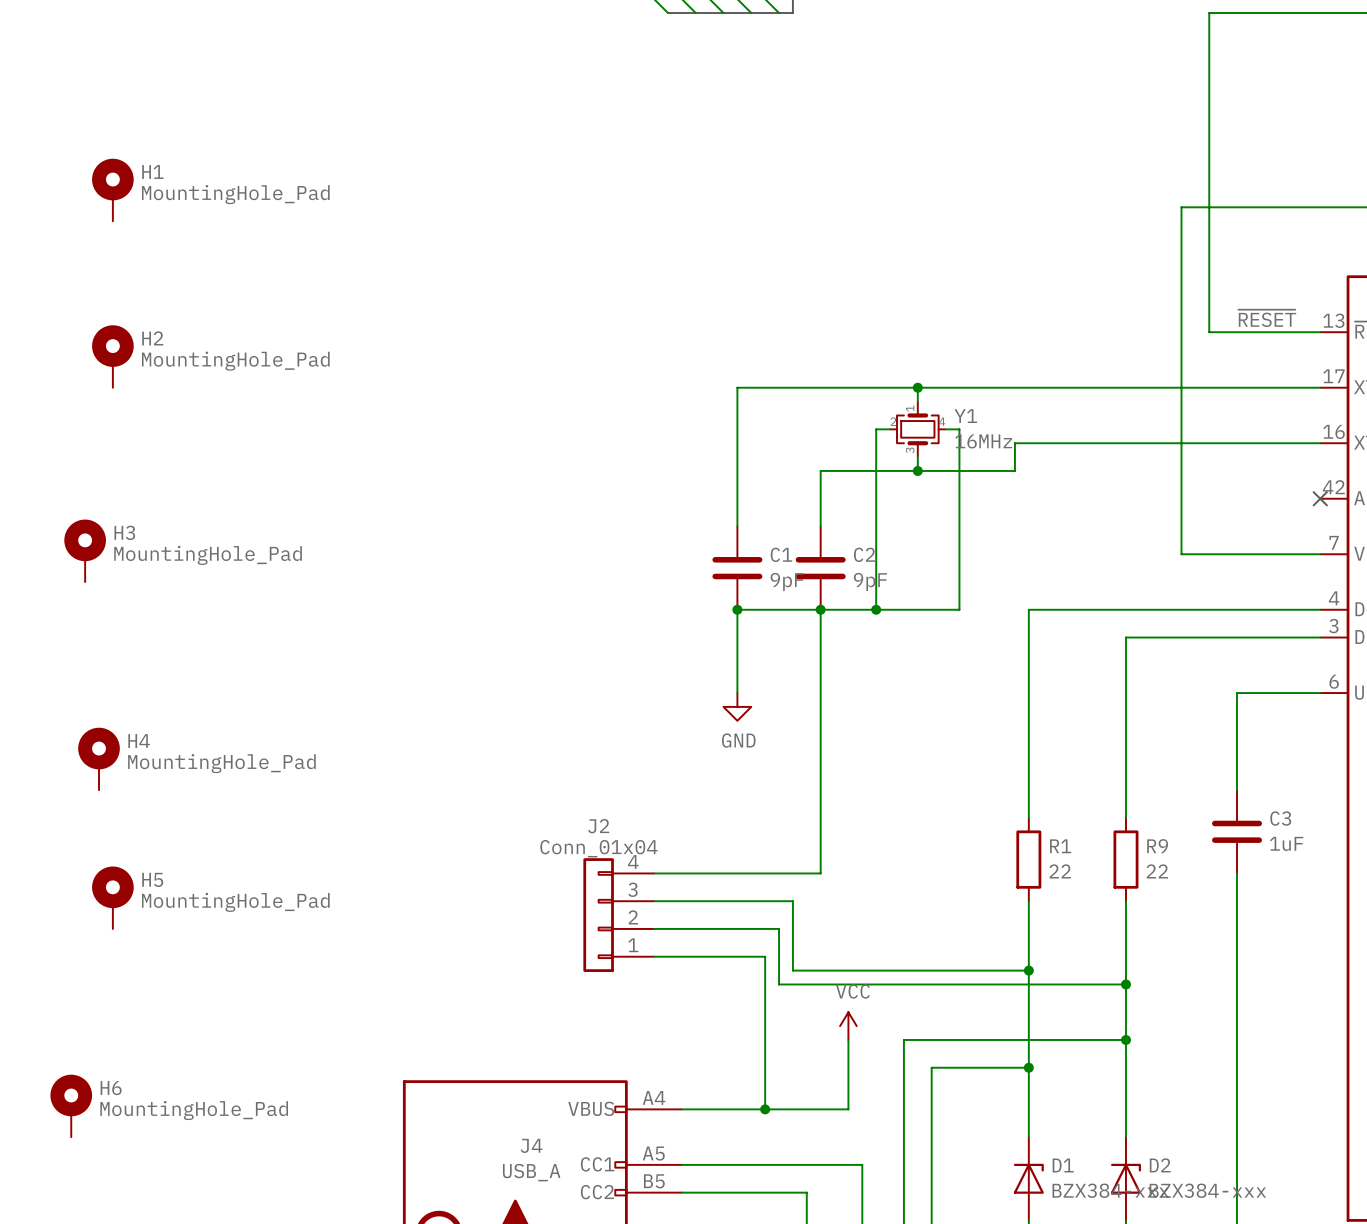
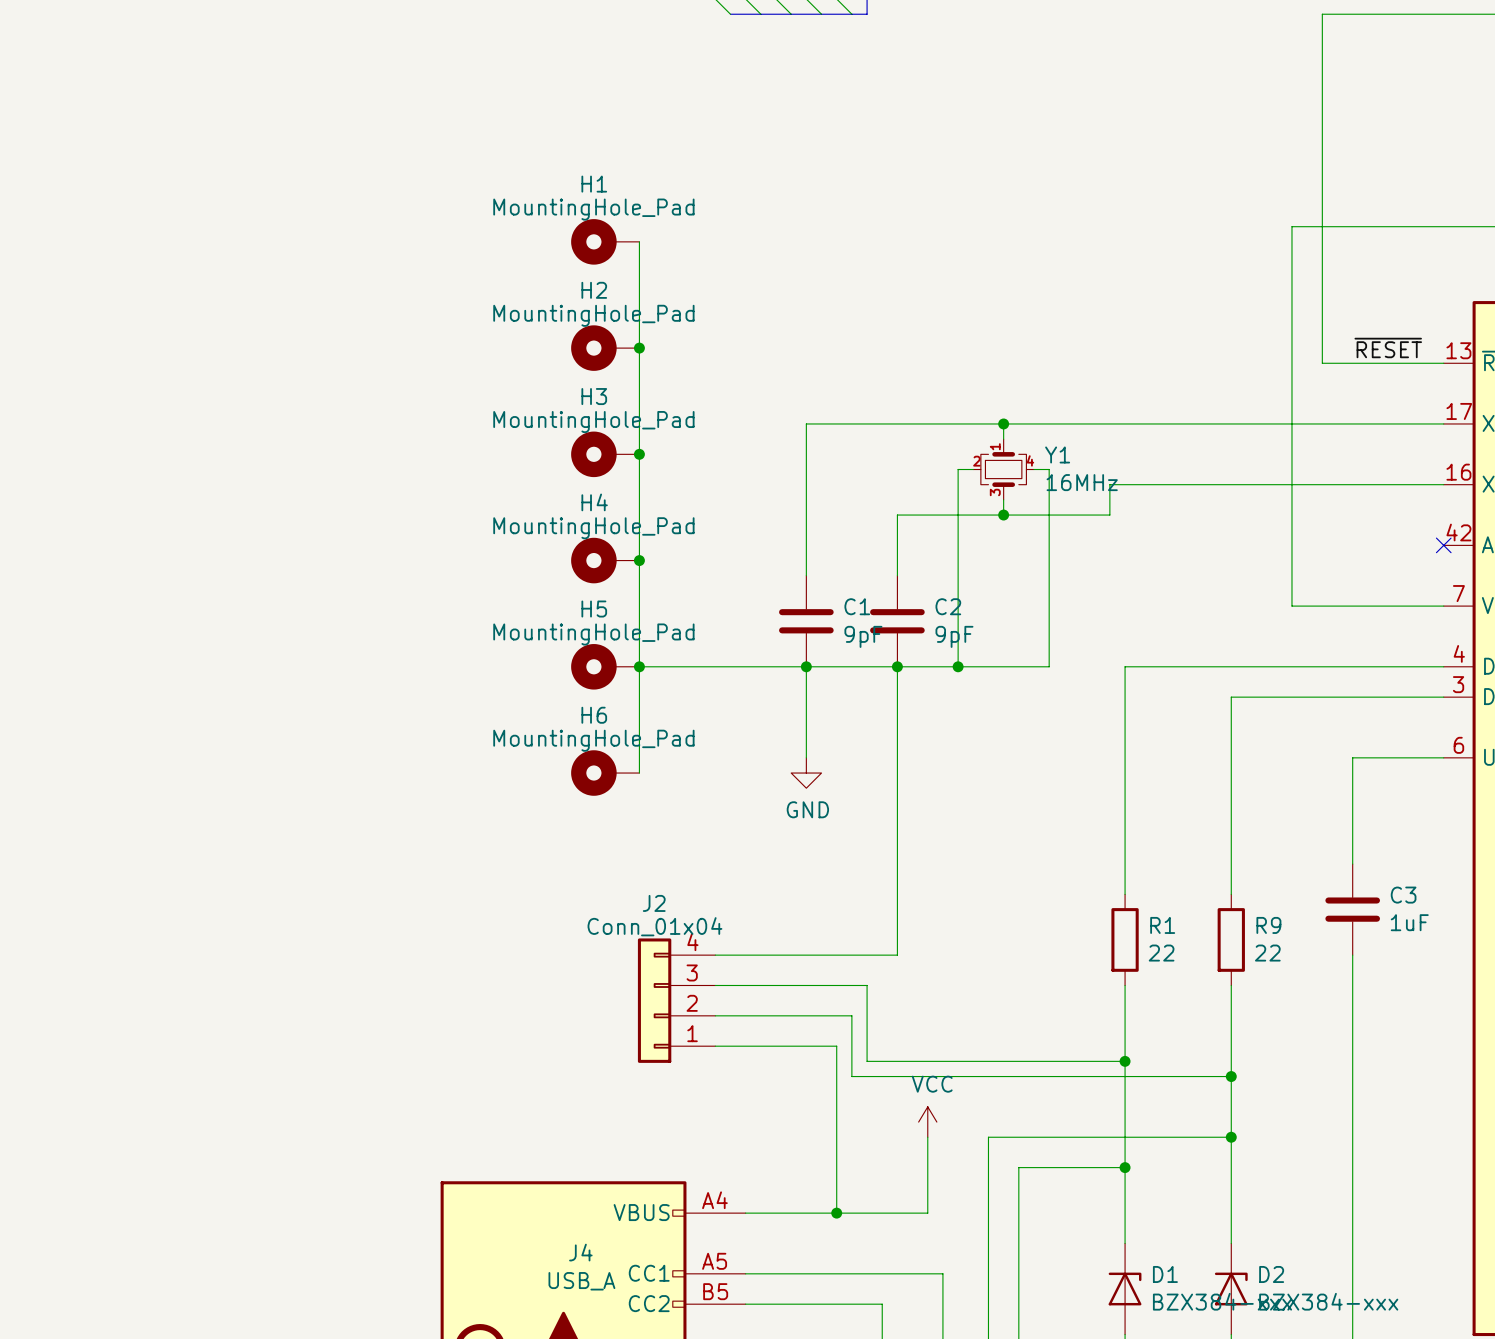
H1 rotation: 0° (112, 179) -> 90° counterclockwise (593, 241)
H1 position: (112, 189) -> (605, 241)
H1 value position: MountingHole_Pad (235, 194) -> MountingHole_Pad (593, 209)
wire: none -> (639, 241) (639, 773)
junction: none -> (639, 348)
H2 rotation: 0° (112, 346) -> 90° counterclockwise (593, 348)
H2 position: (112, 356) -> (605, 348)
H2 value position: MountingHole_Pad (235, 361) -> MountingHole_Pad (593, 315)
junction: none -> (639, 454)
junction: none -> (639, 560)
H3 rotation: 0° (85, 540) -> 90° counterclockwise (593, 454)
H3 position: (85, 550) -> (605, 454)
H3 value position: MountingHole_Pad (208, 555) -> MountingHole_Pad (593, 422)
wire: none -> (639, 666) (806, 666)
junction: none -> (639, 666)
H4 rotation: 0° (99, 748) -> 90° counterclockwise (593, 560)
H4 position: (99, 758) -> (605, 560)
H4 value position: MountingHole_Pad (221, 763) -> MountingHole_Pad (593, 528)
H5 rotation: 0° (112, 887) -> 90° counterclockwise (593, 666)
H5 position: (112, 897) -> (605, 666)
H5 value position: MountingHole_Pad (235, 902) -> MountingHole_Pad (593, 634)
H6 rotation: 0° (71, 1095) -> 90° counterclockwise (593, 773)
H6 position: (71, 1105) -> (605, 773)
H6 value position: MountingHole_Pad (194, 1110) -> MountingHole_Pad (593, 740)

